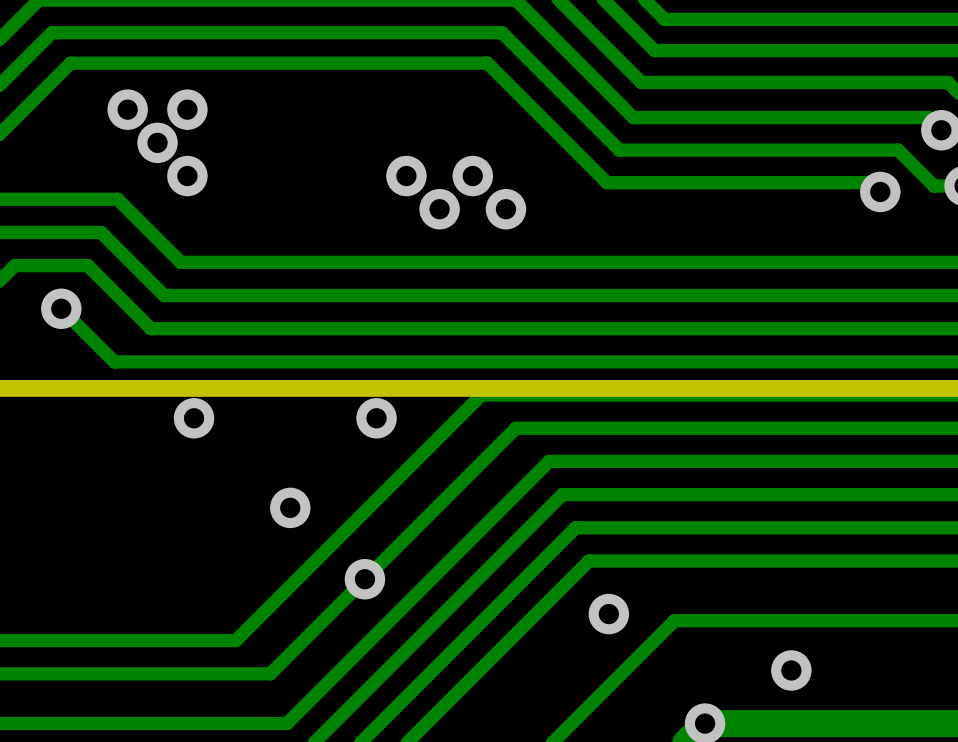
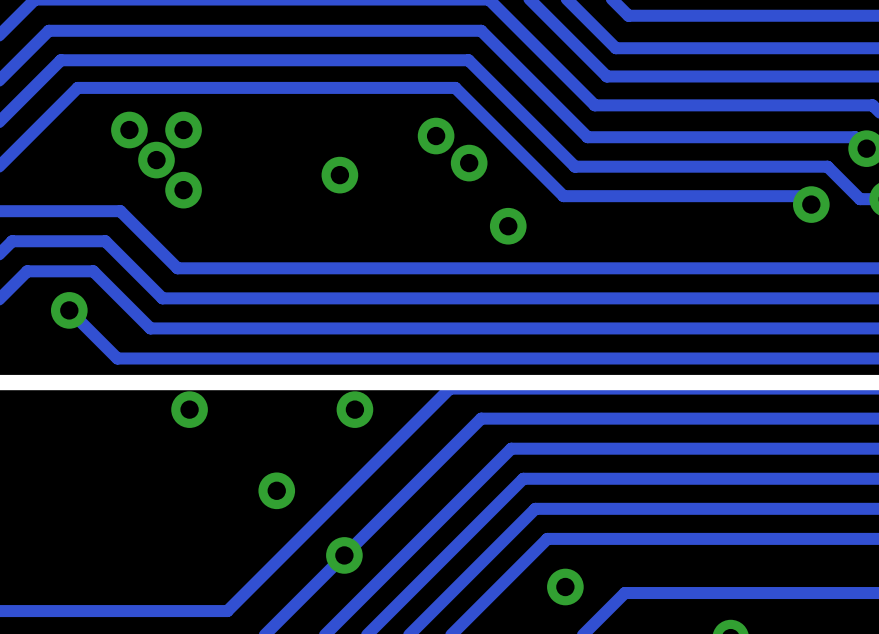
via: none -> (436, 136)
via: none -> (339, 175)
via: (406, 176) -> none
via position: (472, 176) -> (469, 163)
via: (439, 209) -> none
via position: (505, 209) -> (508, 226)

